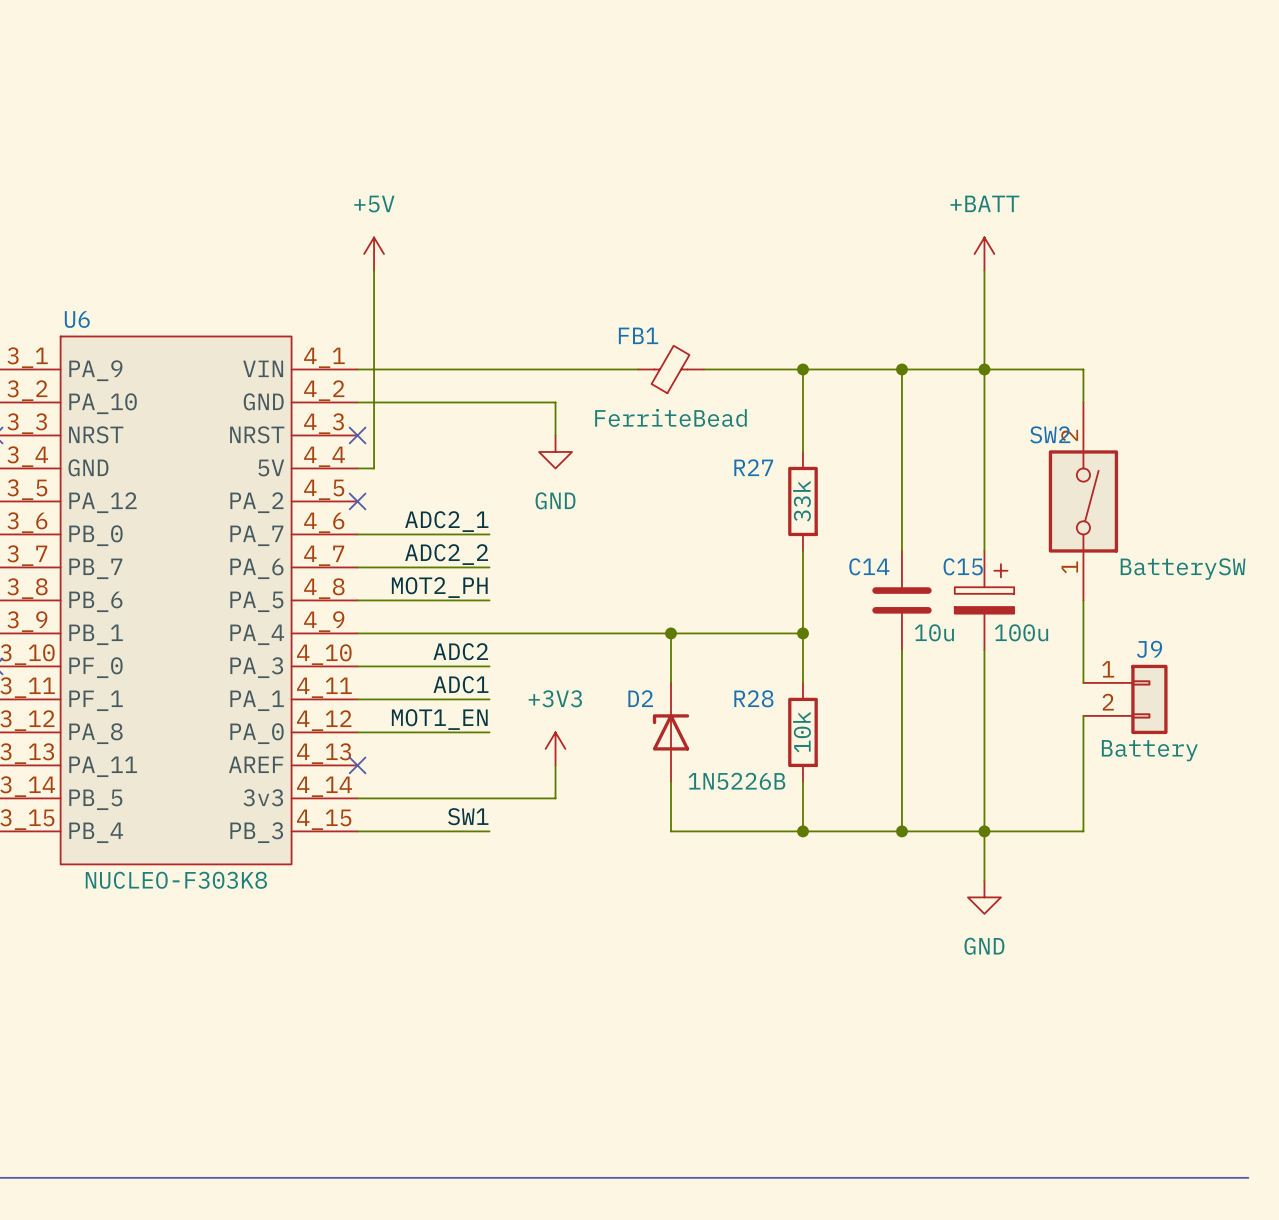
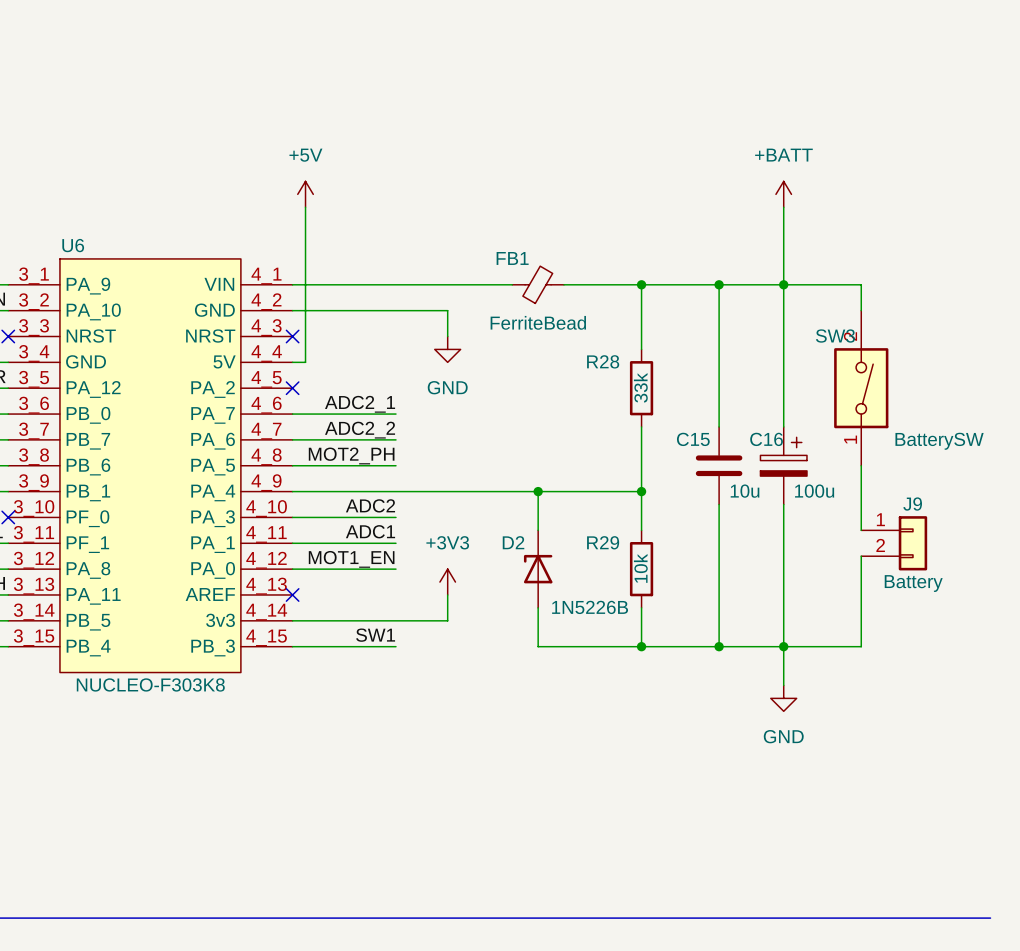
SW2 name: SW2 (1050, 434) -> SW3 (835, 336)
R27 name: R27 (753, 467) -> R28 (603, 361)
C14 name: C14 (869, 566) -> C15 (693, 439)
C15 name: C15 (963, 566) -> C16 (766, 439)
R28 name: R28 (753, 698) -> R29 (603, 542)

